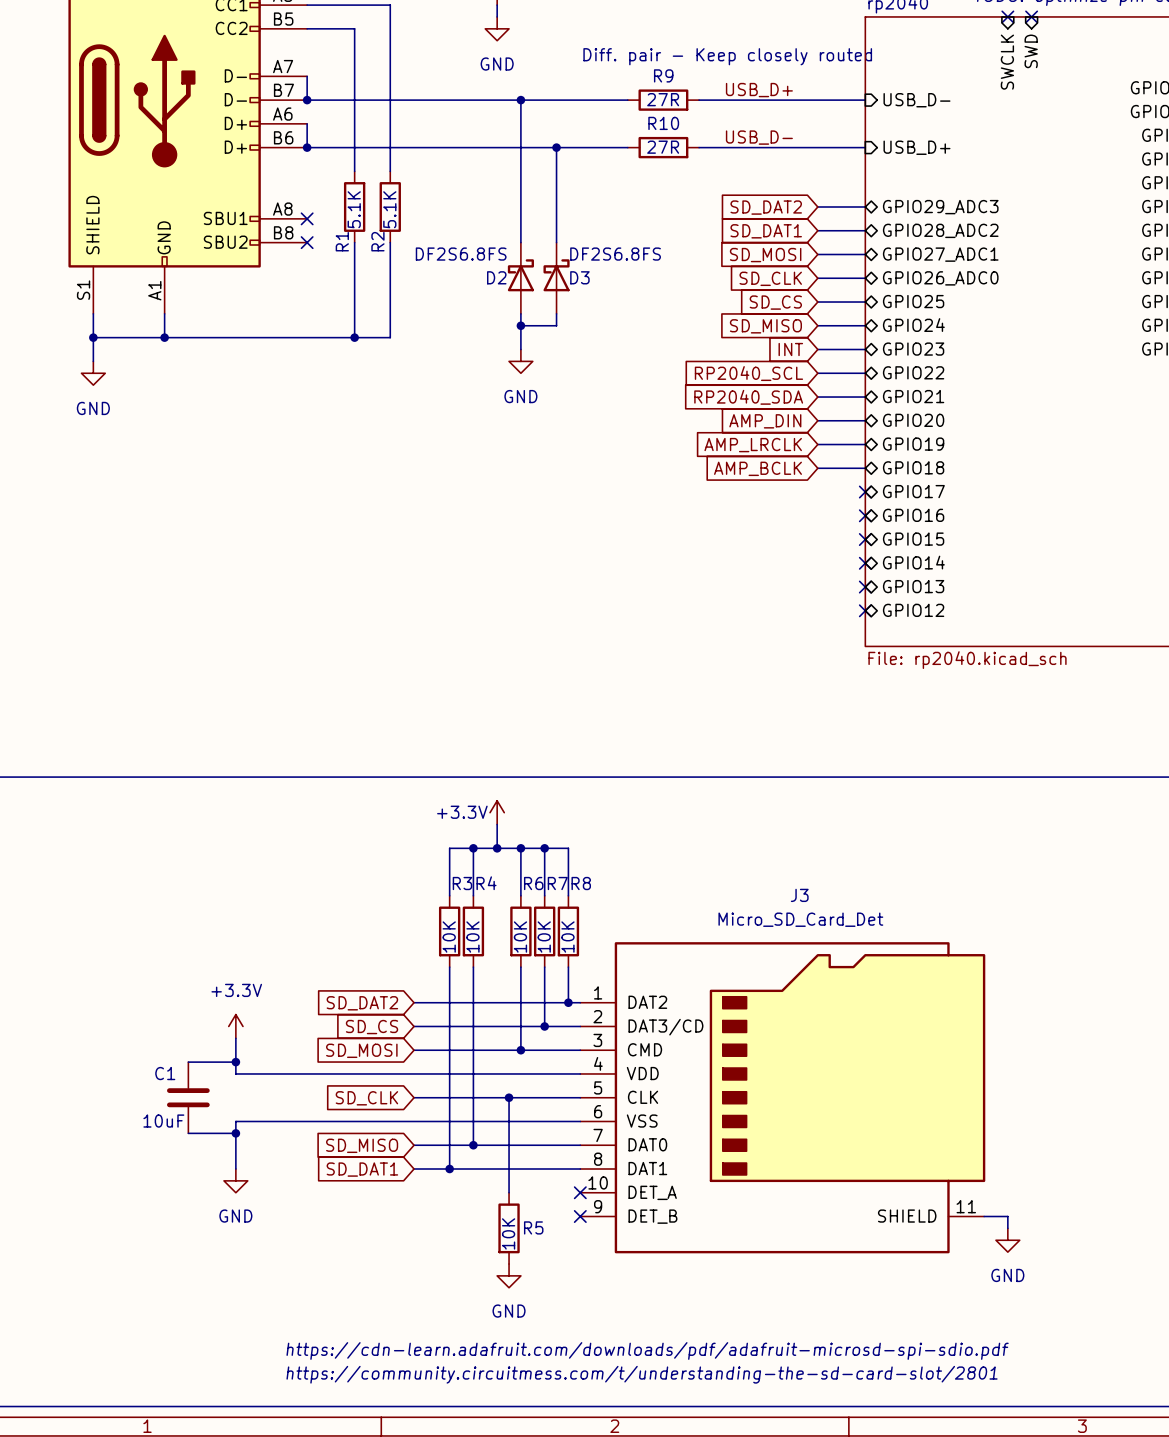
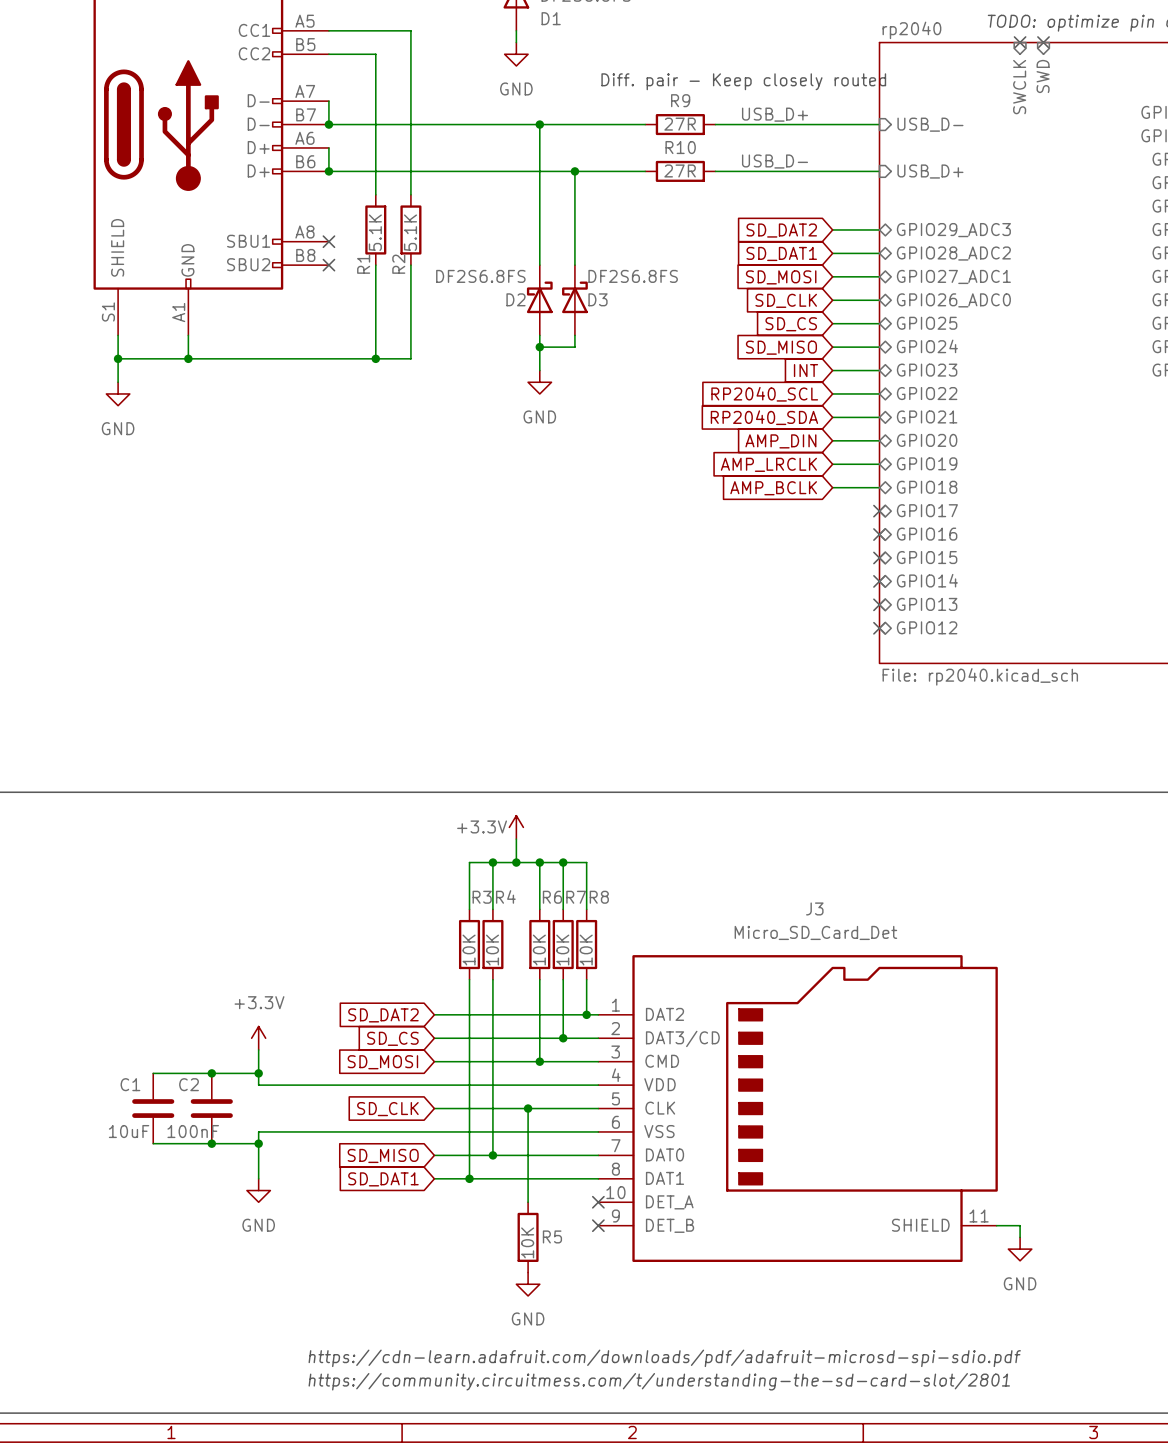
wire: none -> (153, 1073) (211, 1073)
junction: none -> (211, 1073)
C1 name: C1 (165, 1073) -> C2 (189, 1084)
C1: none -> 10uF (153, 1108)
C1 value: 10uF (163, 1121) -> 100nF (193, 1131)
wire: none -> (153, 1143) (211, 1143)
junction: none -> (211, 1143)

